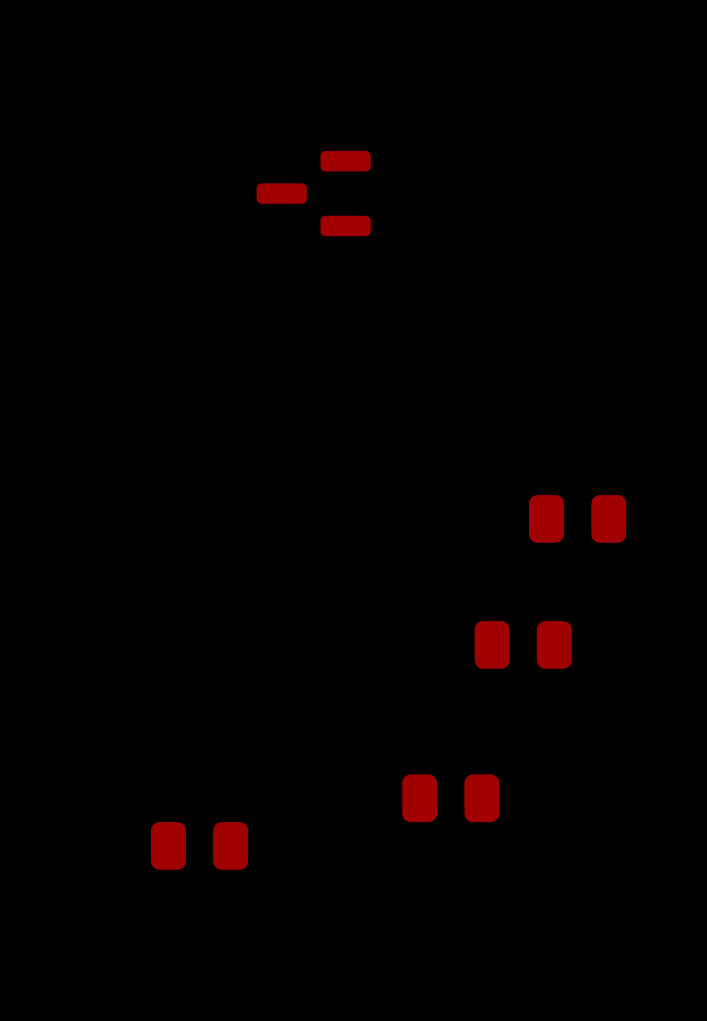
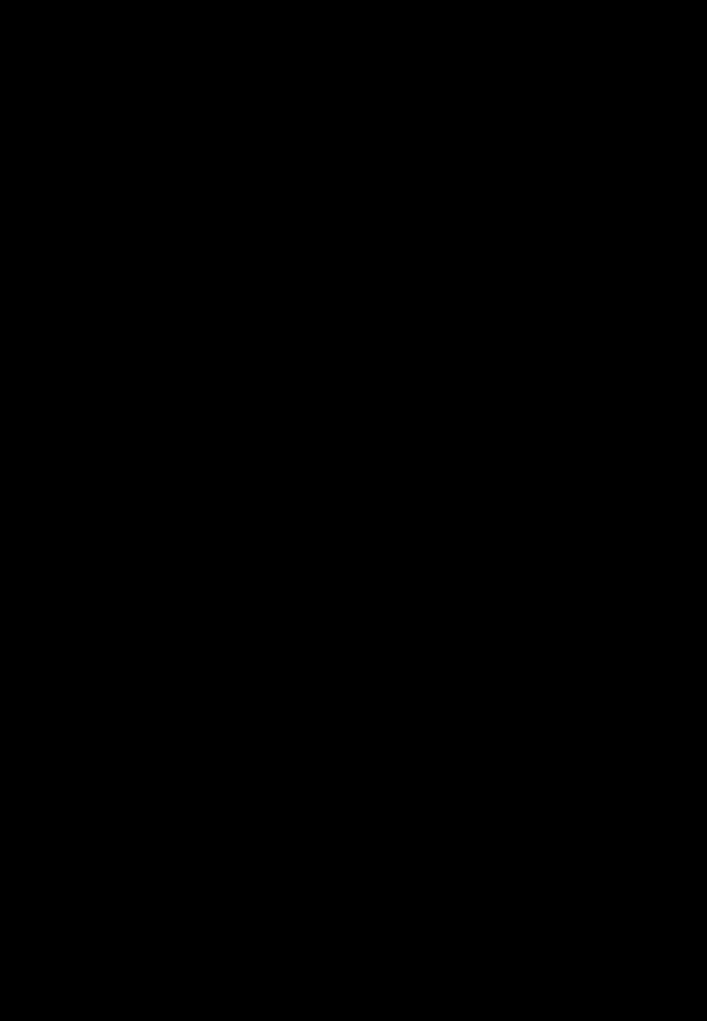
part: (313, 193) -> none
part: (577, 518) -> none
part: (523, 644) -> none
part: (450, 798) -> none
part: (199, 845) -> none

